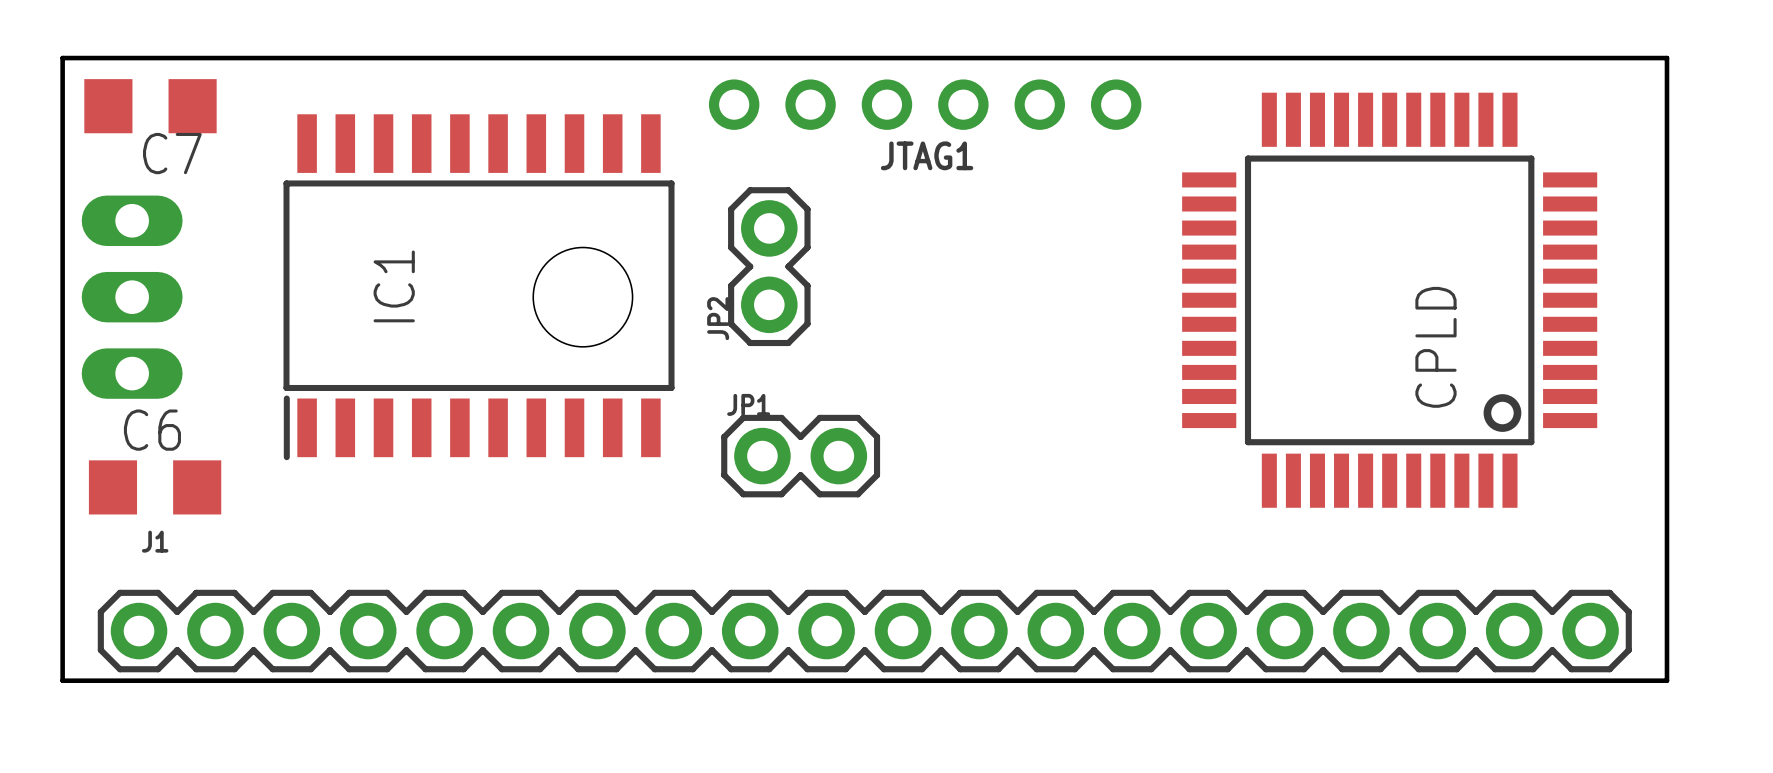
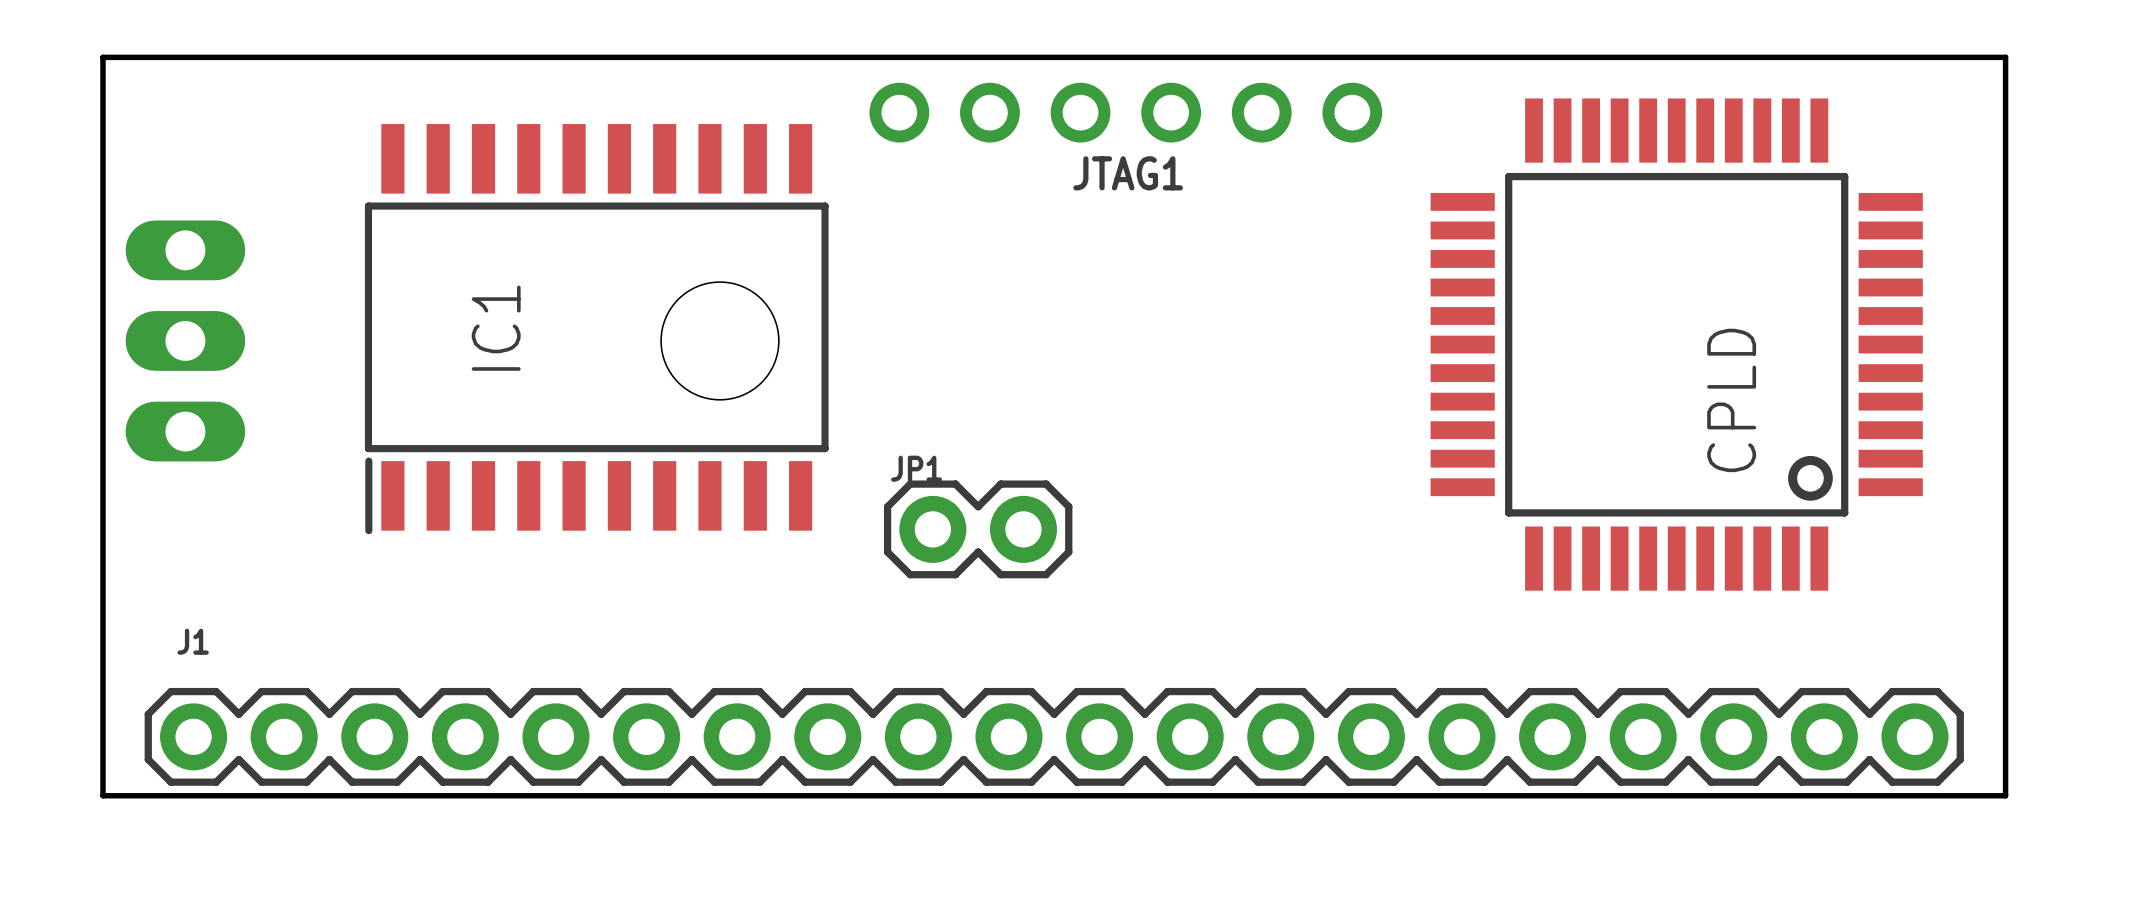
C7: (150, 106) -> none
JP2: (769, 266) -> none
C6: (155, 487) -> none
J1 name position: J1 (155, 541) -> J1 (193, 641)

